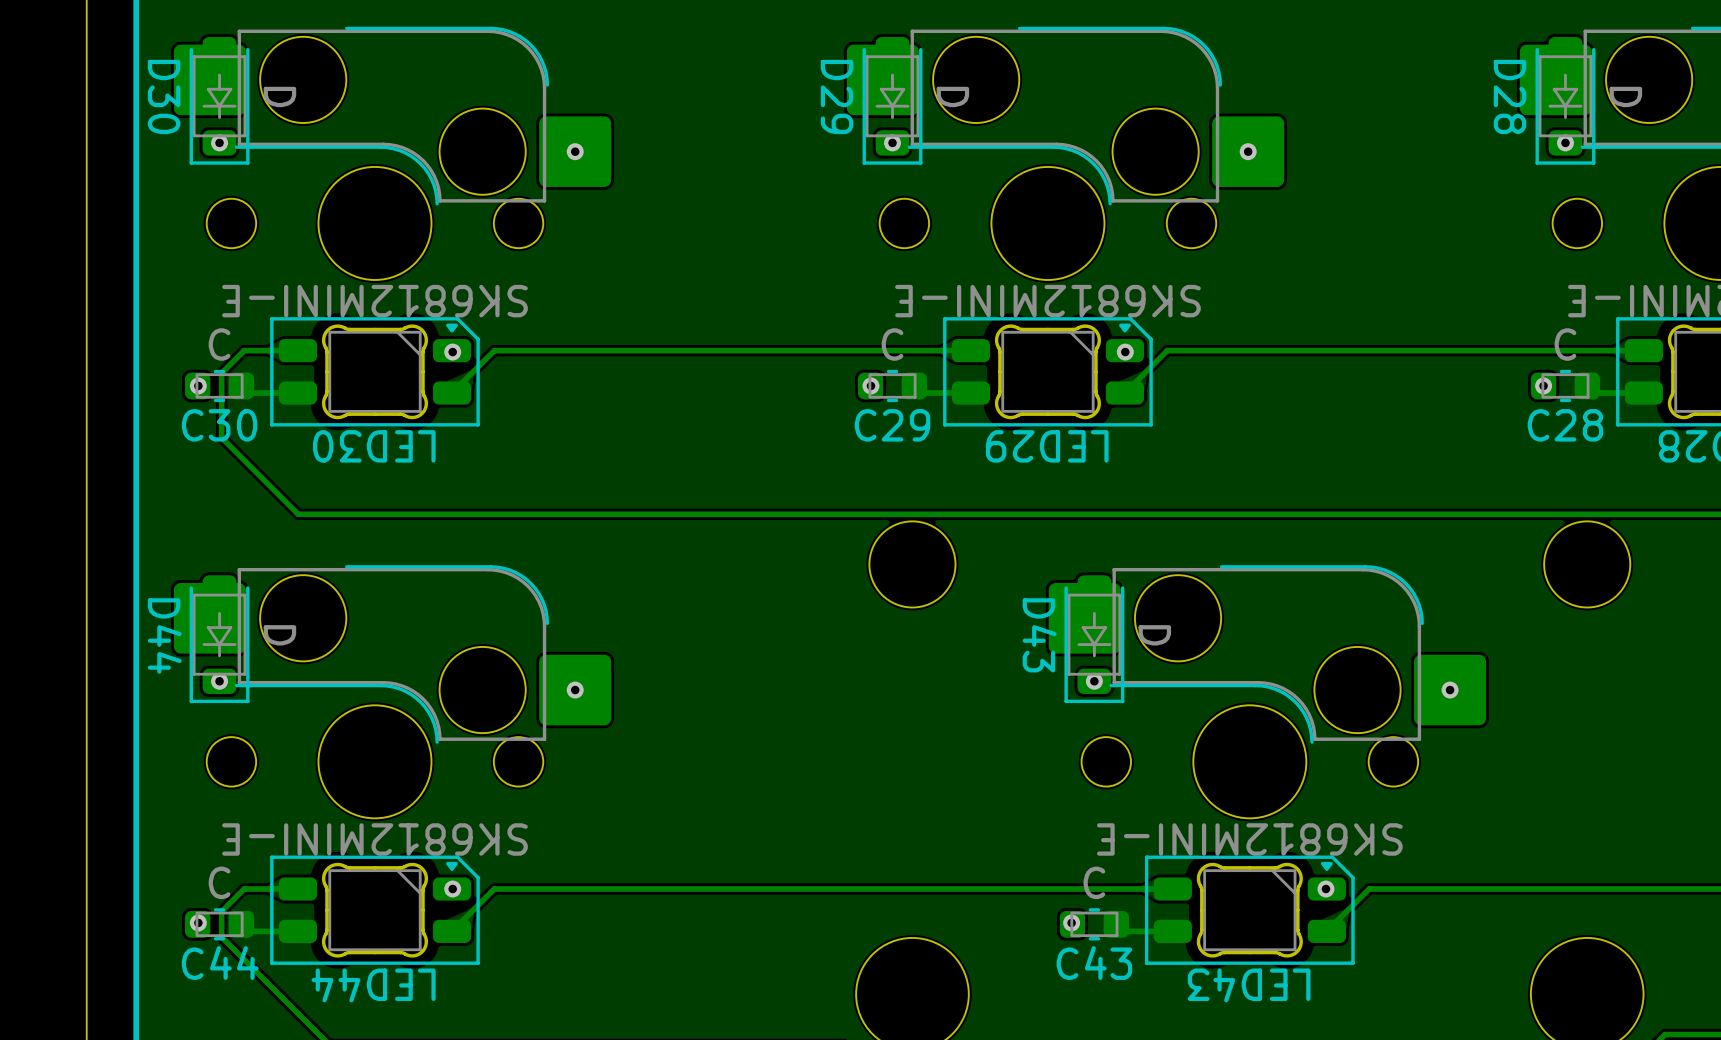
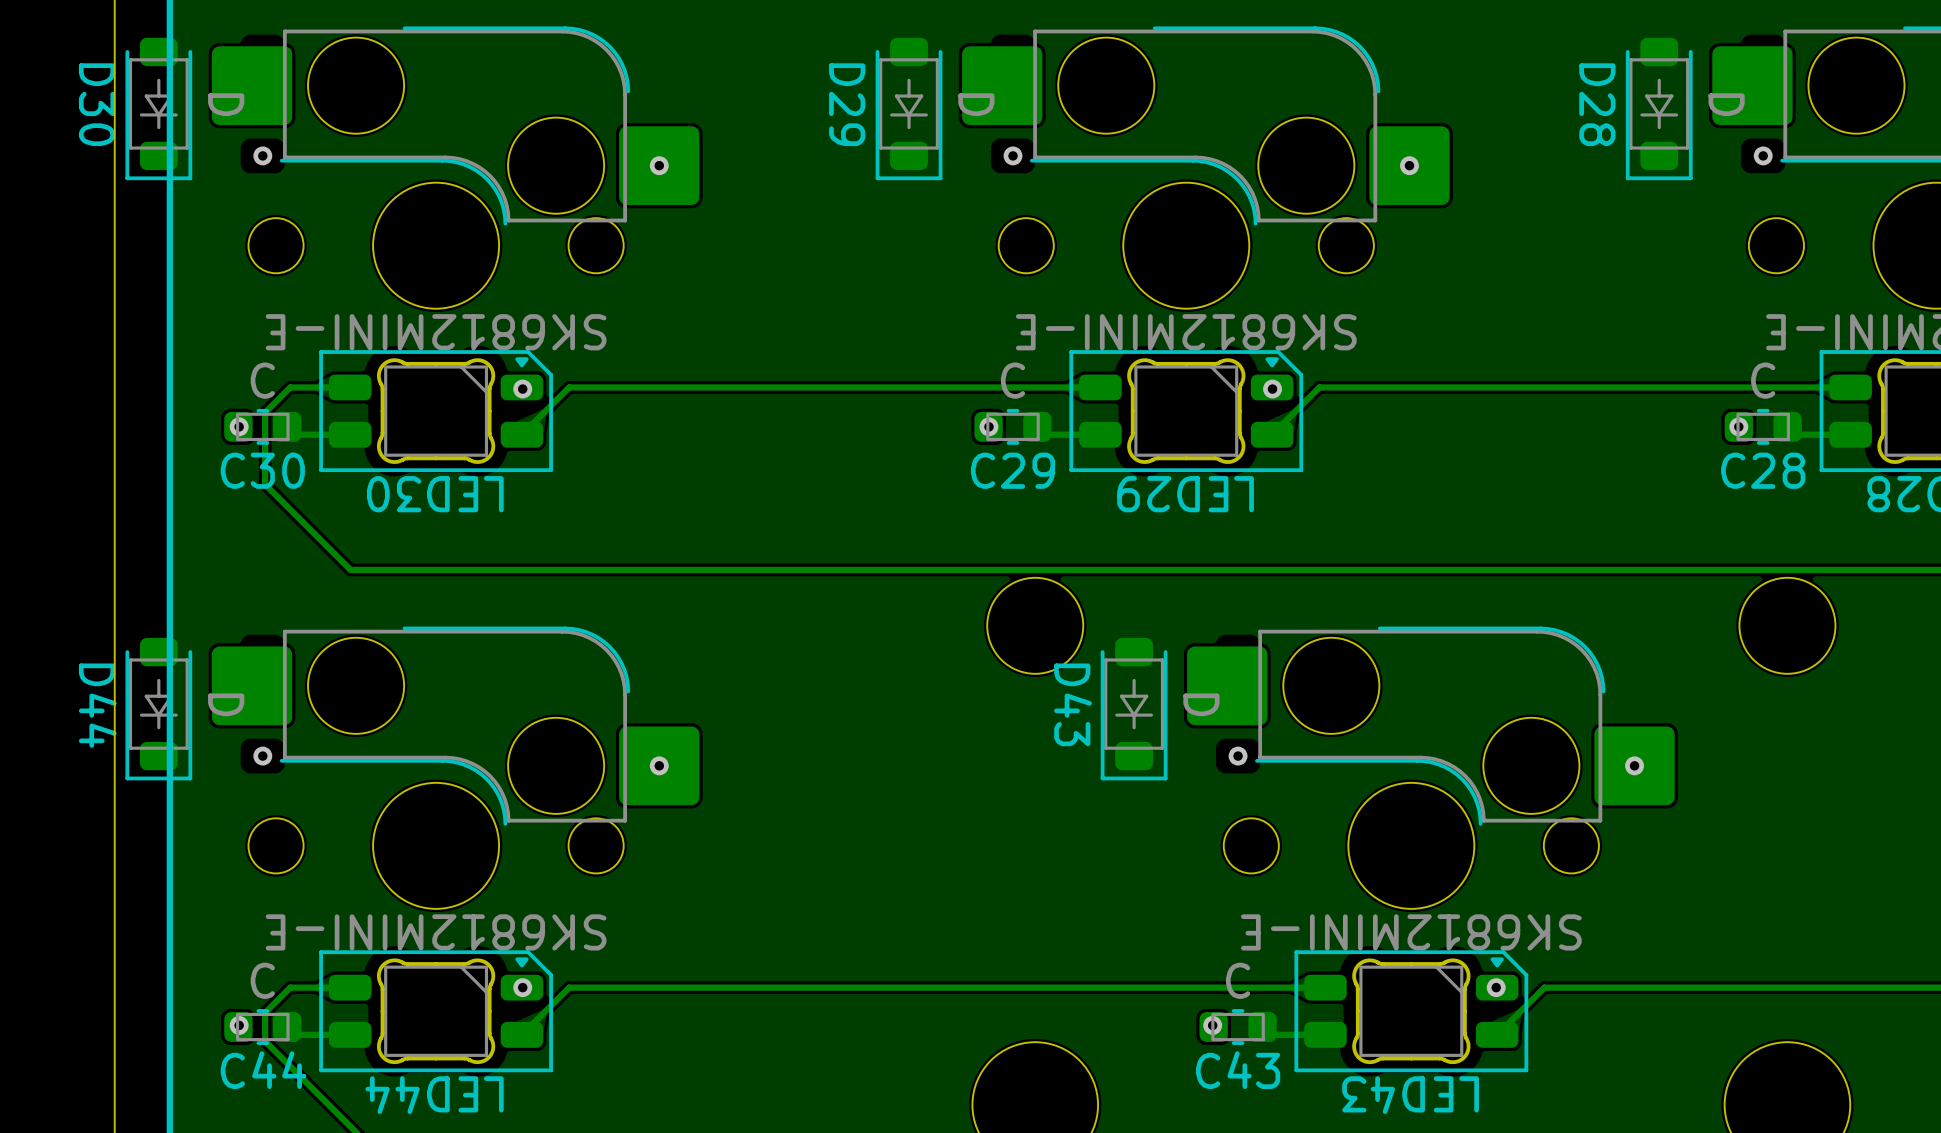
D30 position: (219, 100) -> (158, 108)
D29 position: (892, 100) -> (909, 108)
D28 position: (1565, 100) -> (1659, 108)
D44 position: (219, 639) -> (158, 709)
D43 position: (1094, 639) -> (1134, 709)

